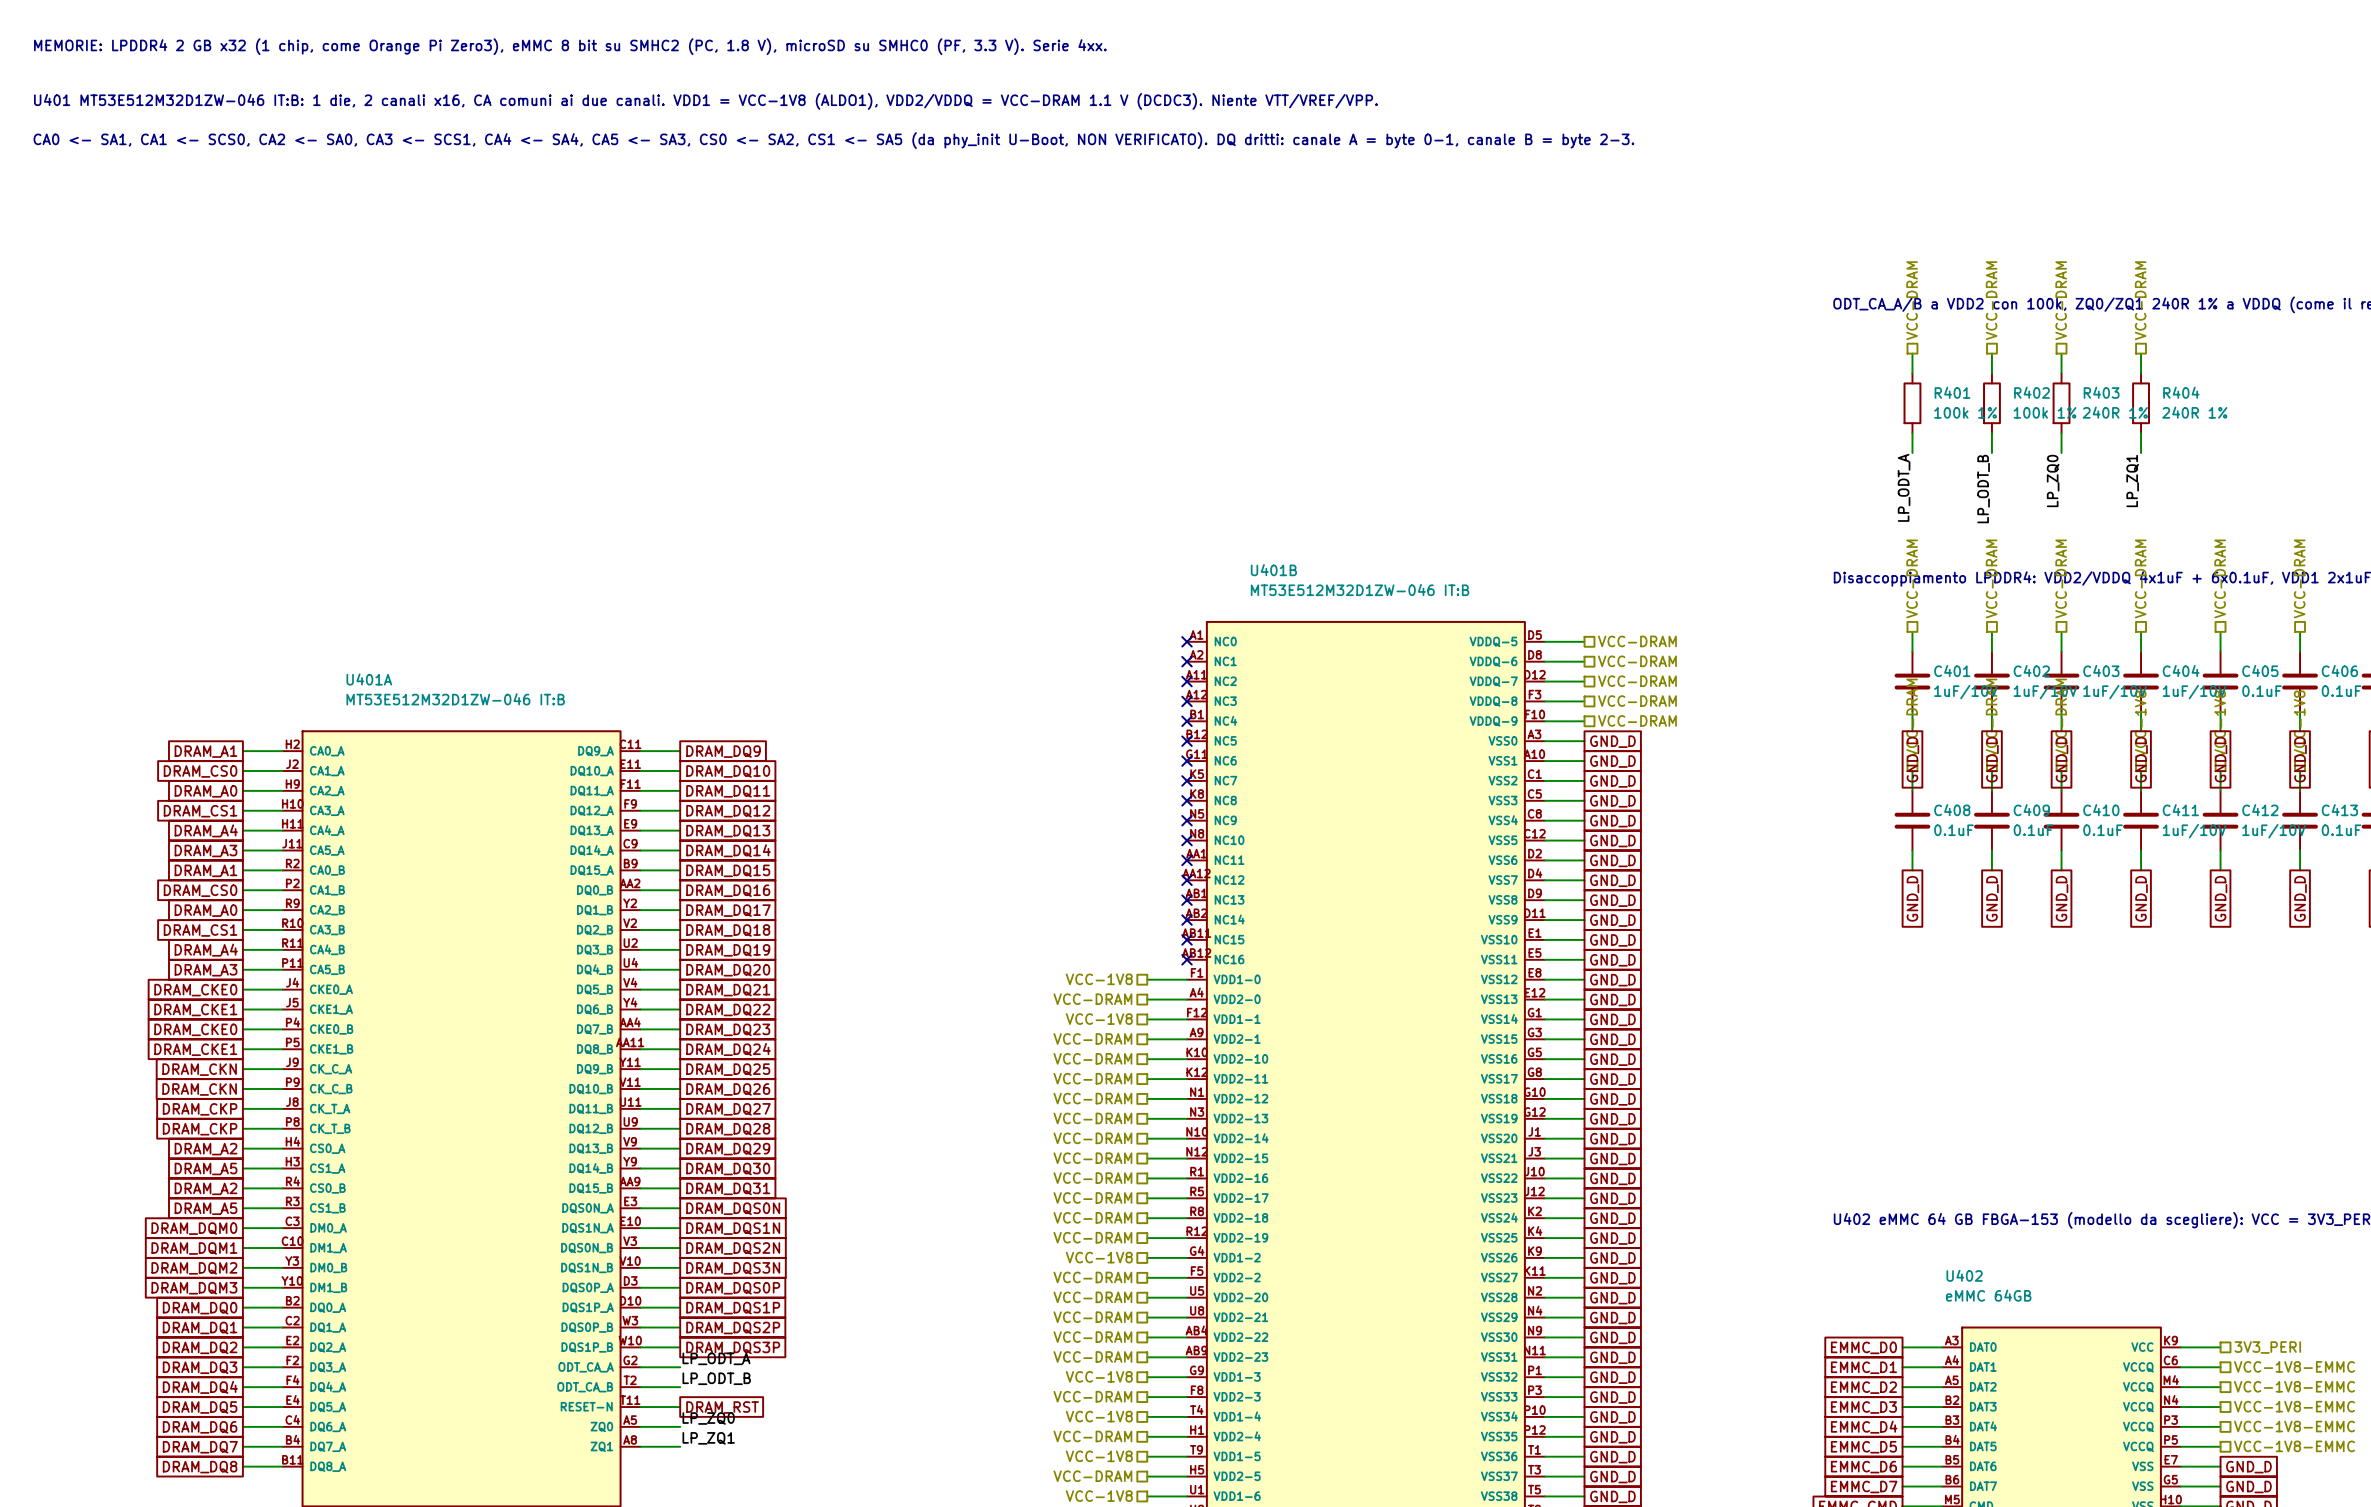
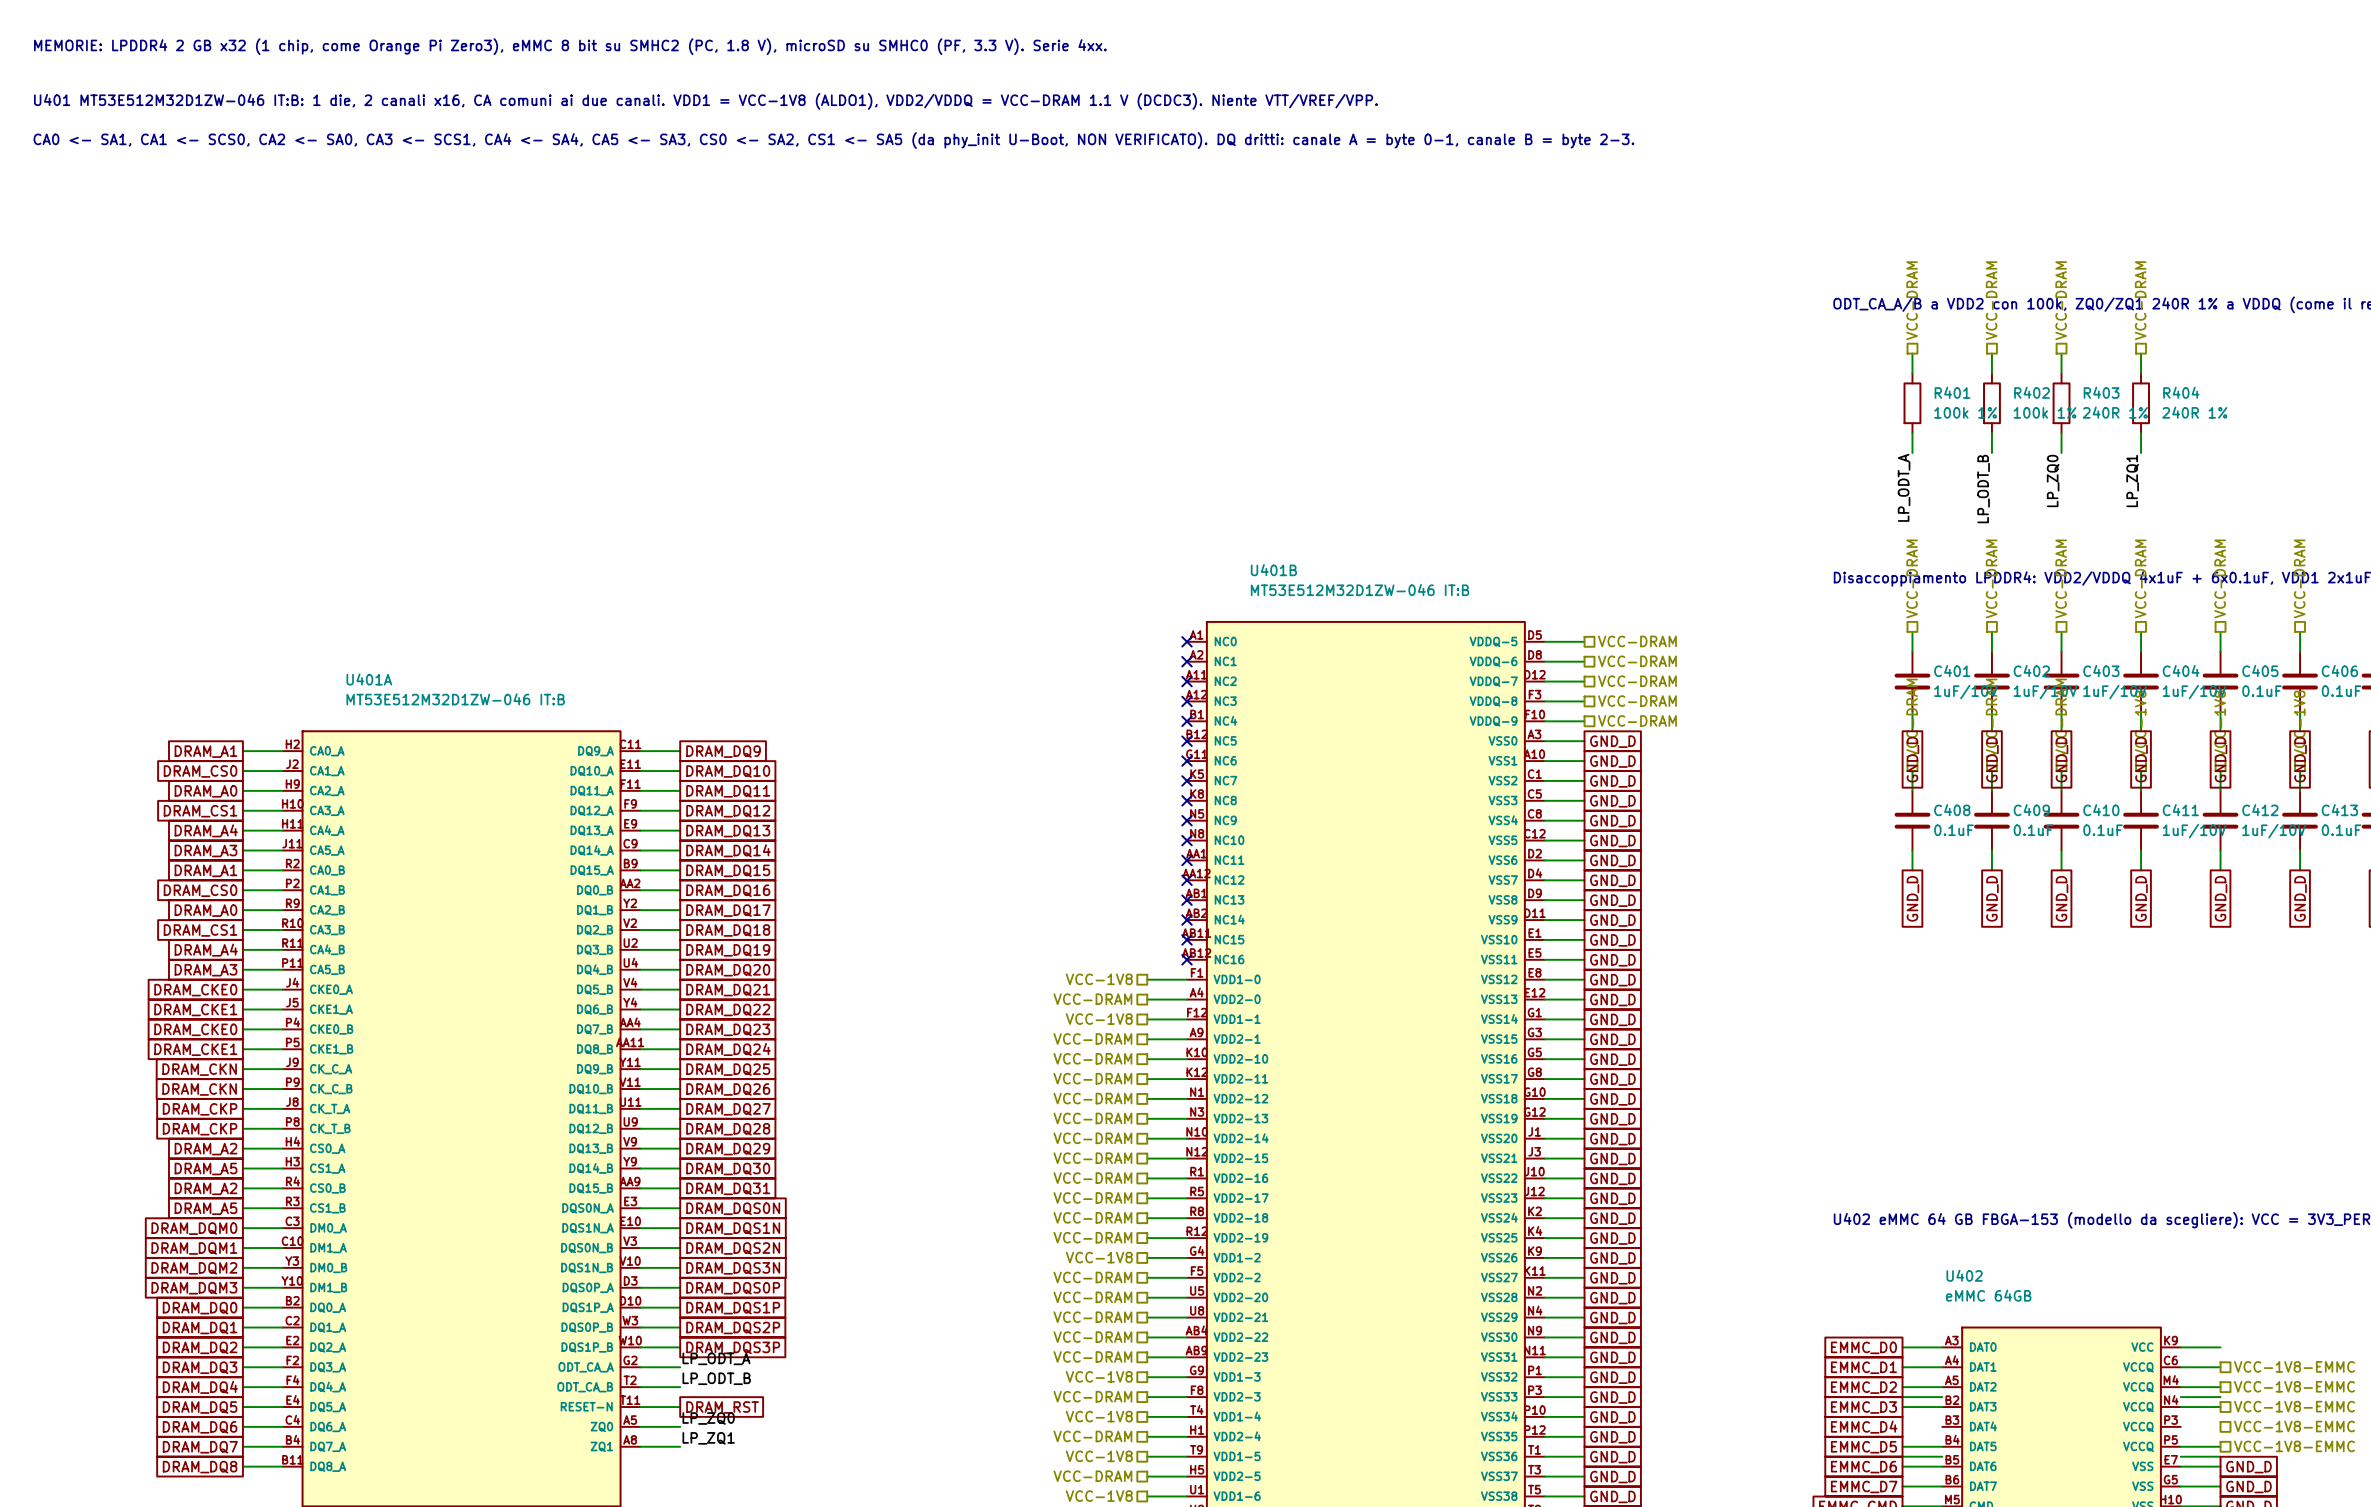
hierarchical label: 3V3_PERI (2267, 1347) -> none
wire: none -> (1902, 1397) (1942, 1397)
wire: none -> (2180, 1397) (2220, 1397)
wire: (1902, 1426) (1942, 1426) -> (1902, 1456) (1942, 1456)
wire: (2180, 1426) (2220, 1426) -> (2180, 1456) (2220, 1456)

